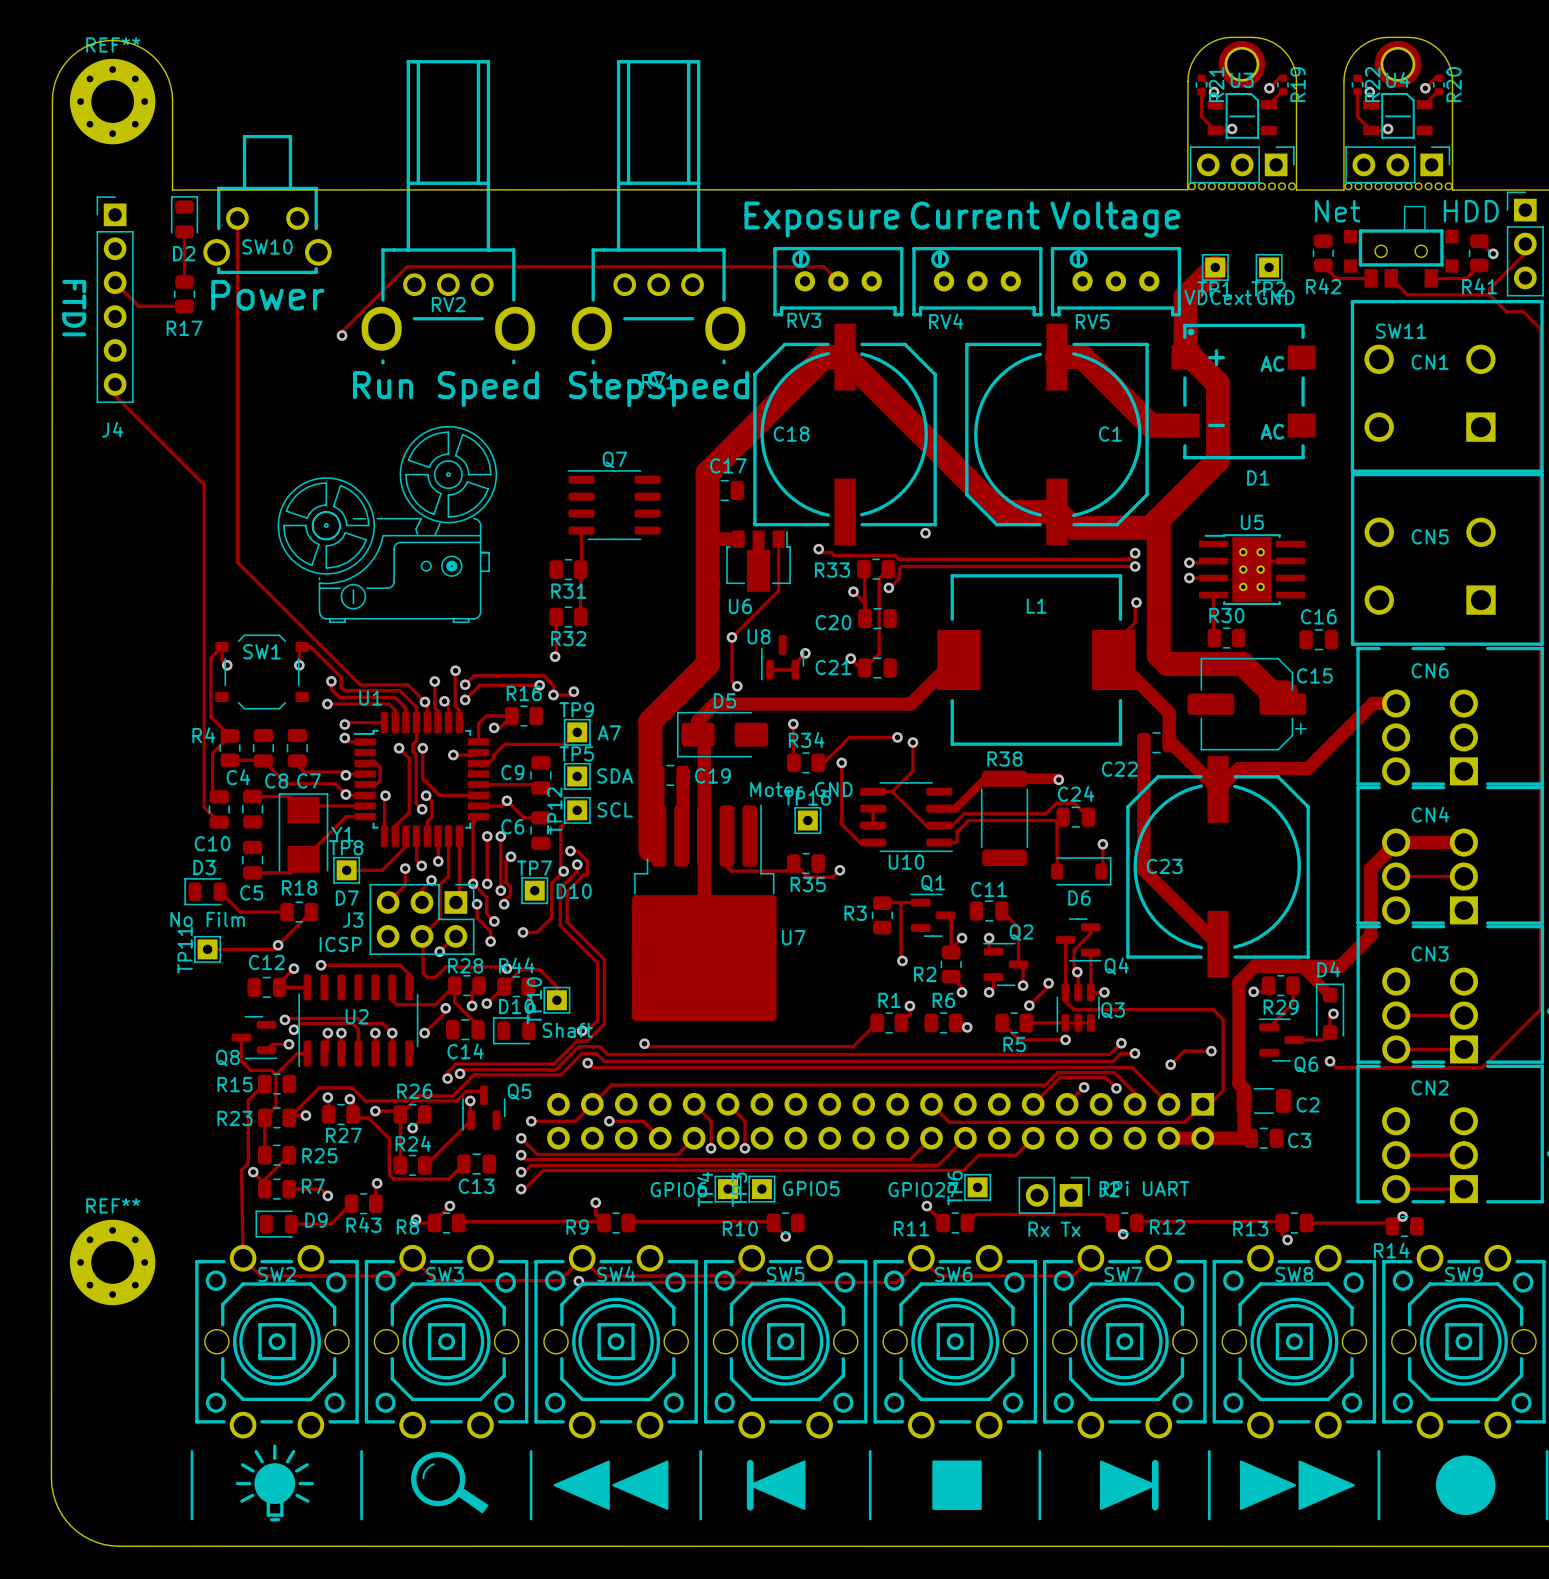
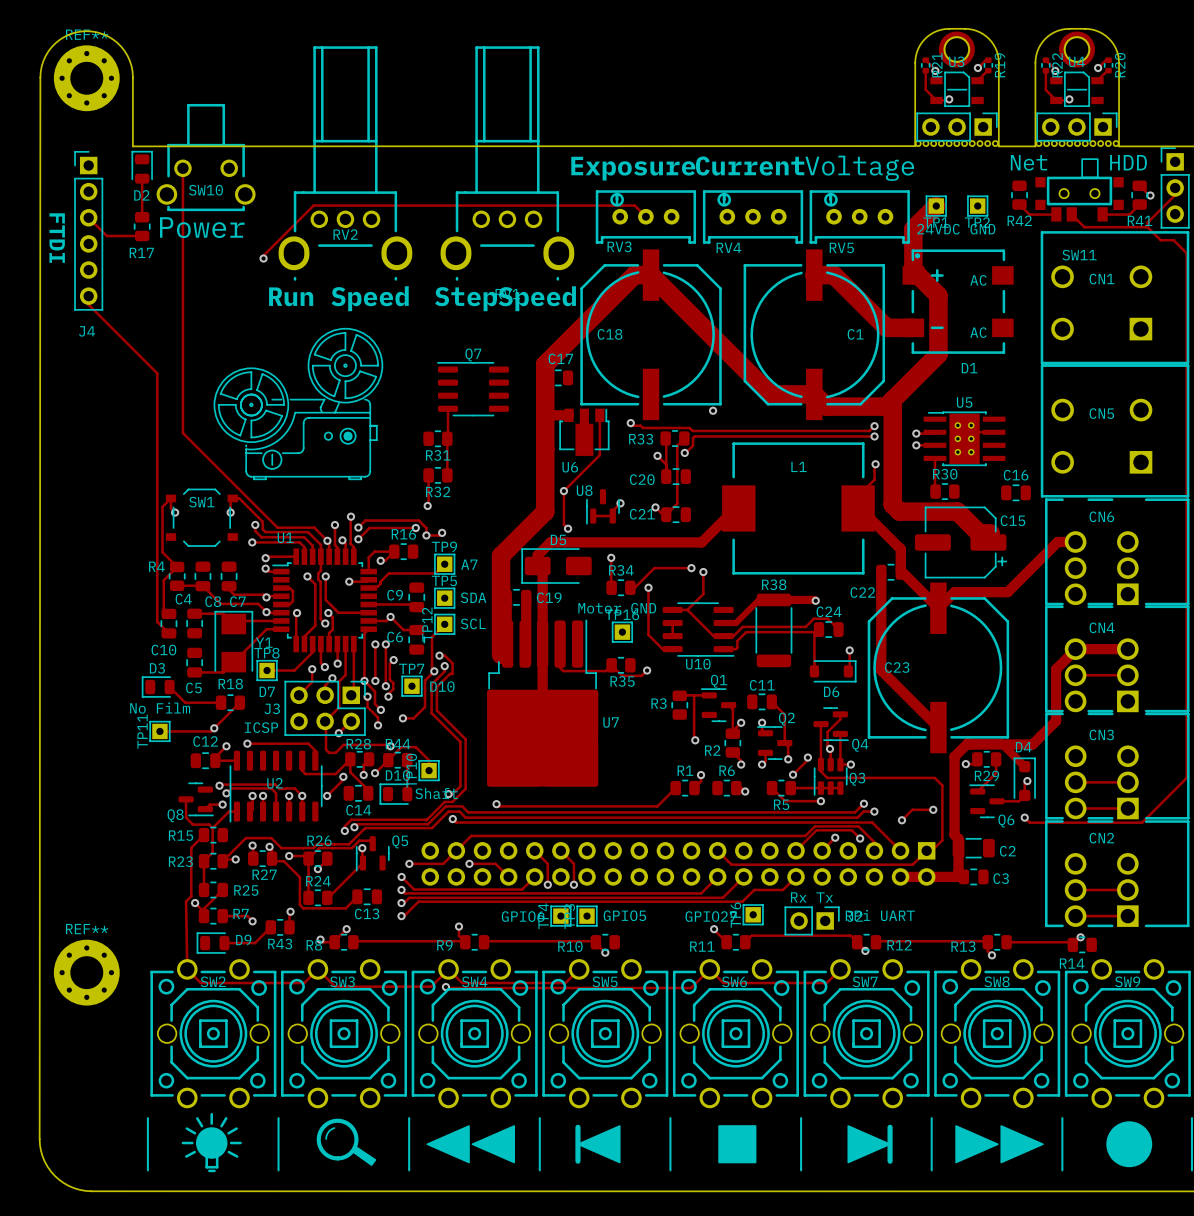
TP1 text: VDCext (1218, 297) -> 24VDC (938, 229)
text position: Rx Tx (1054, 1229) -> Rx Tx (811, 897)

